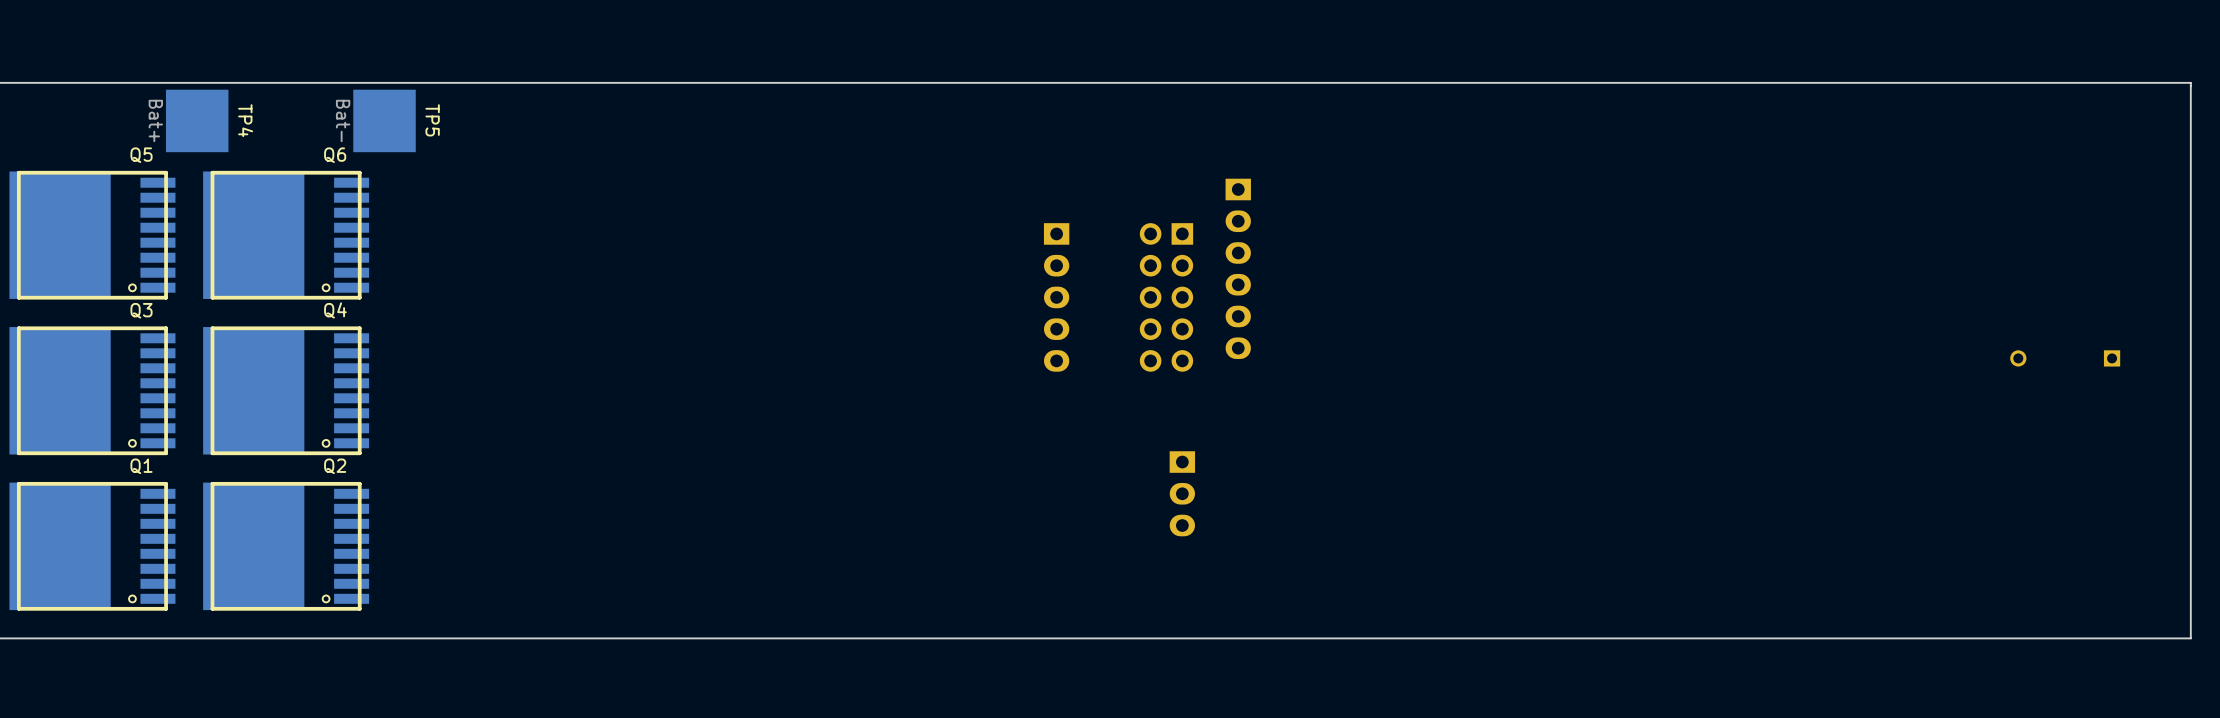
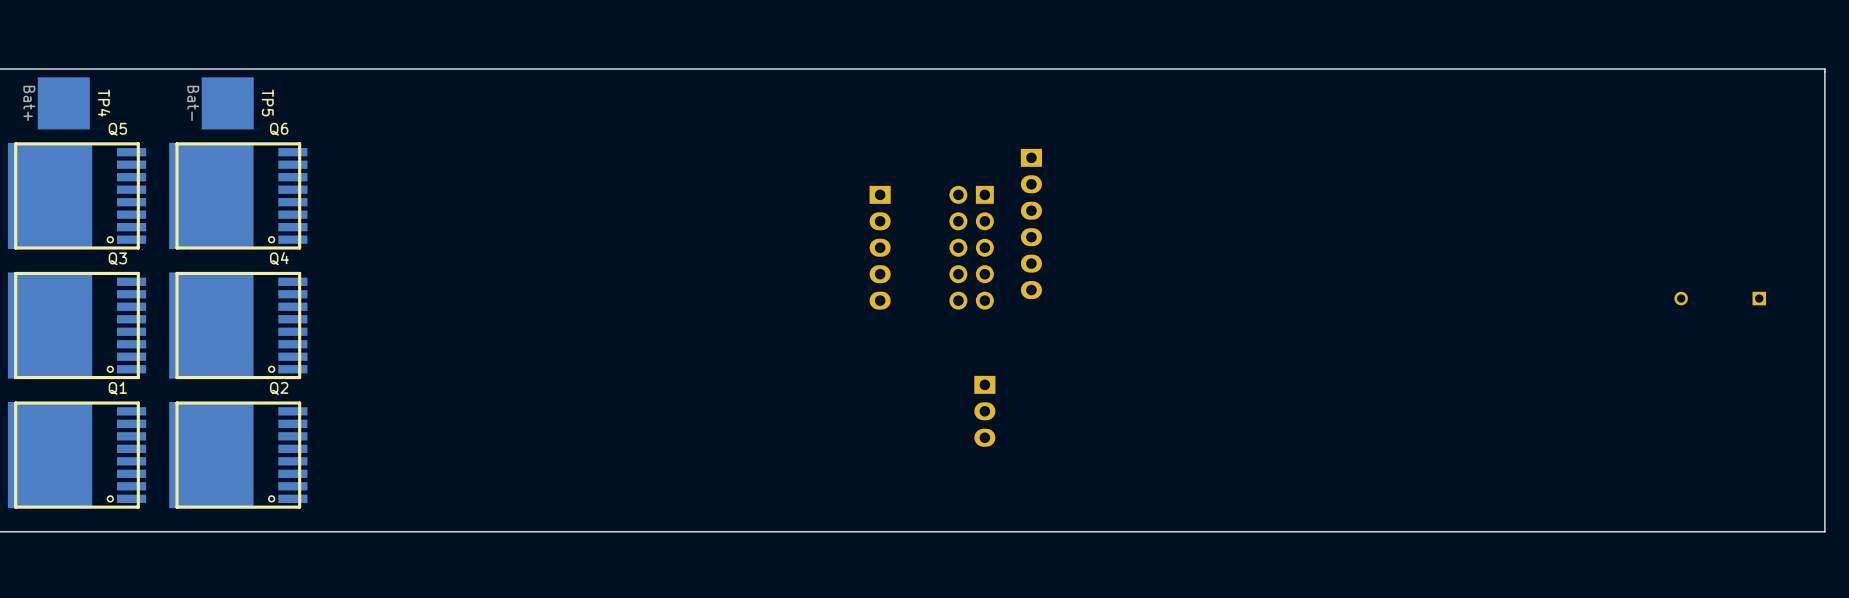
TP4 position: (197, 120) -> (63, 103)
TP5 position: (384, 120) -> (227, 103)

